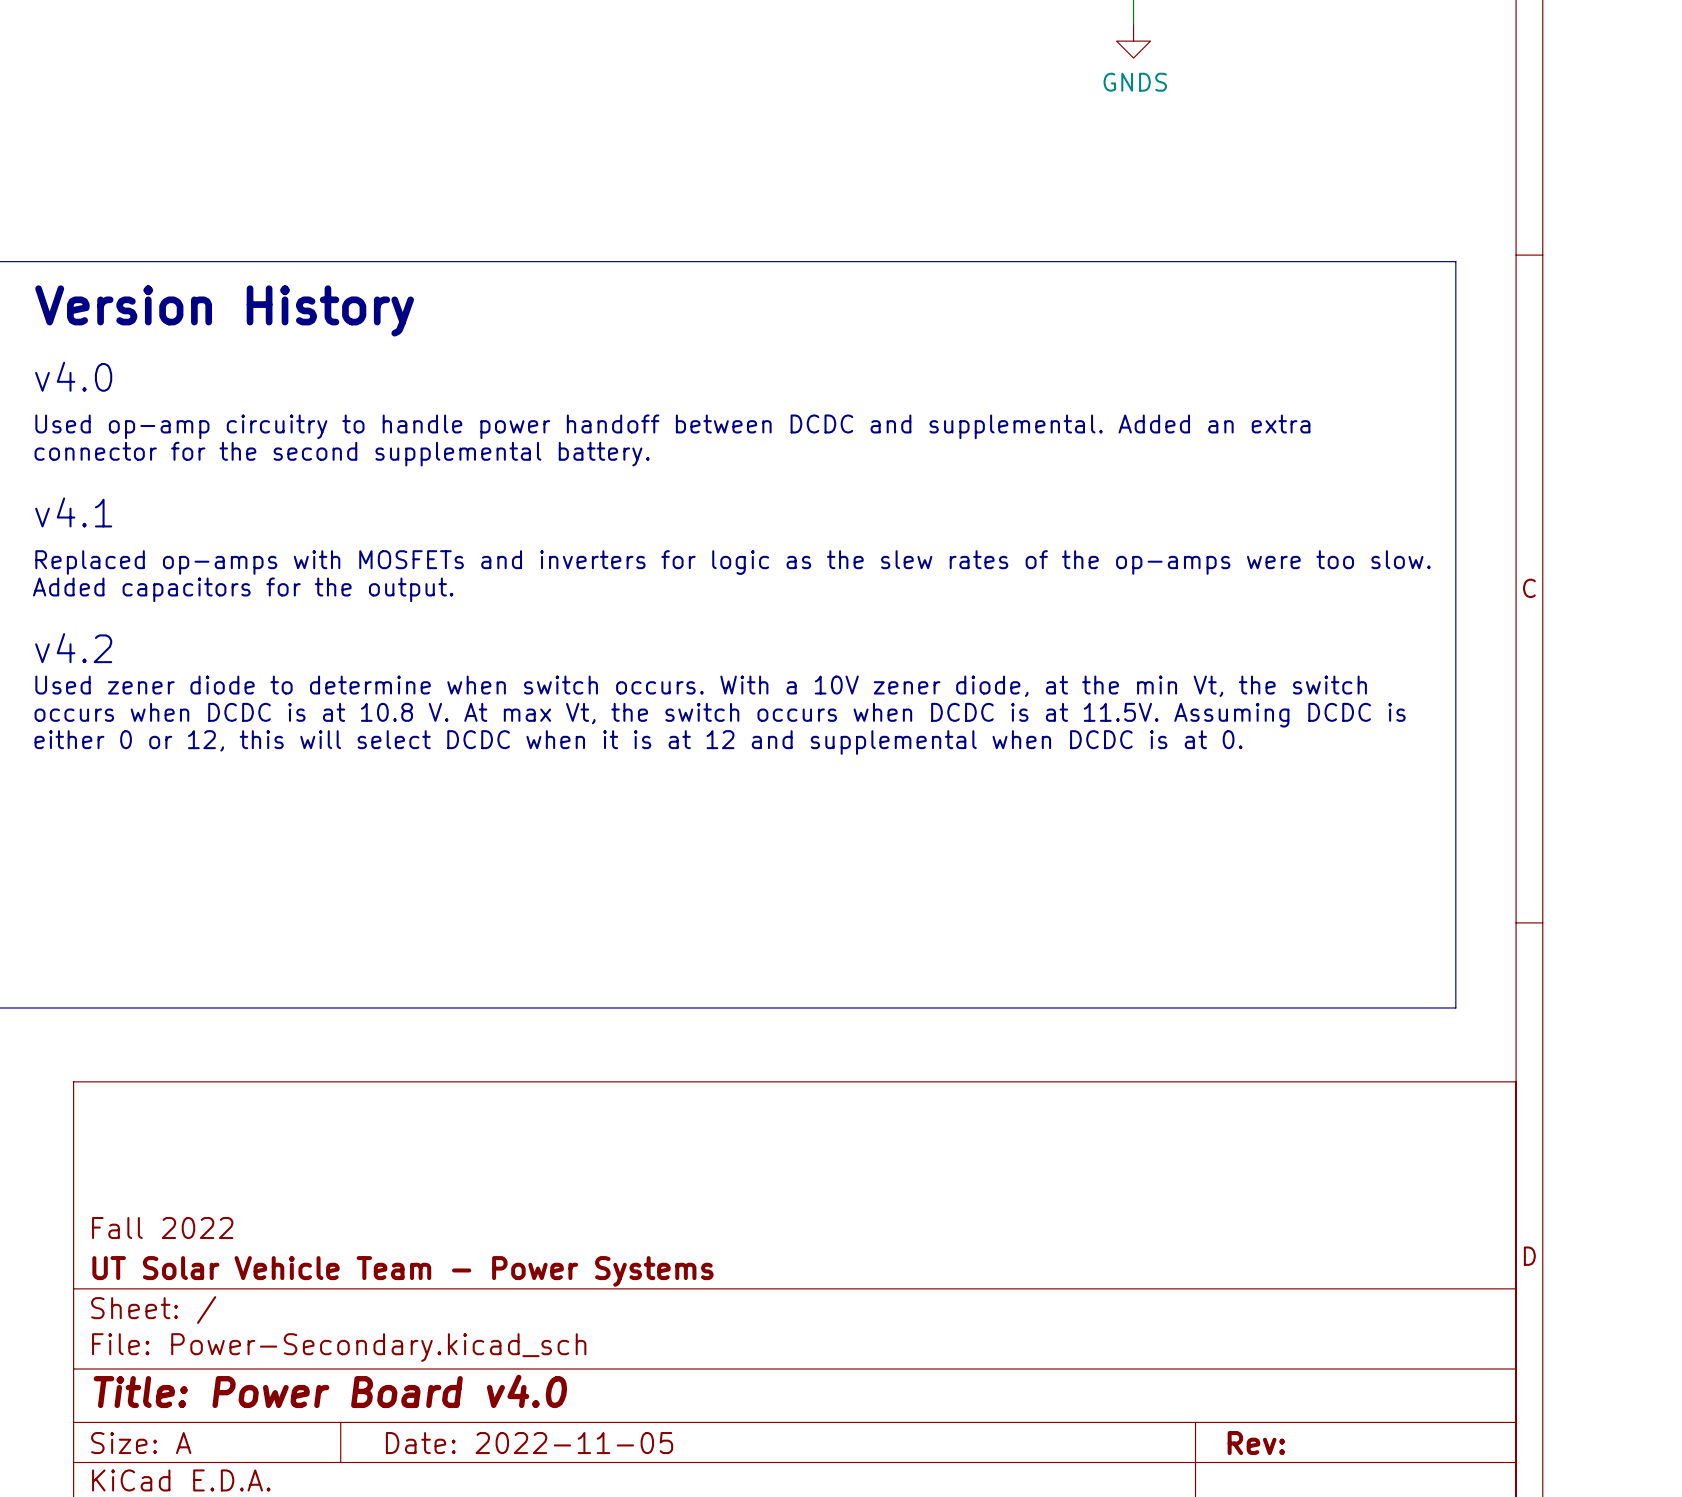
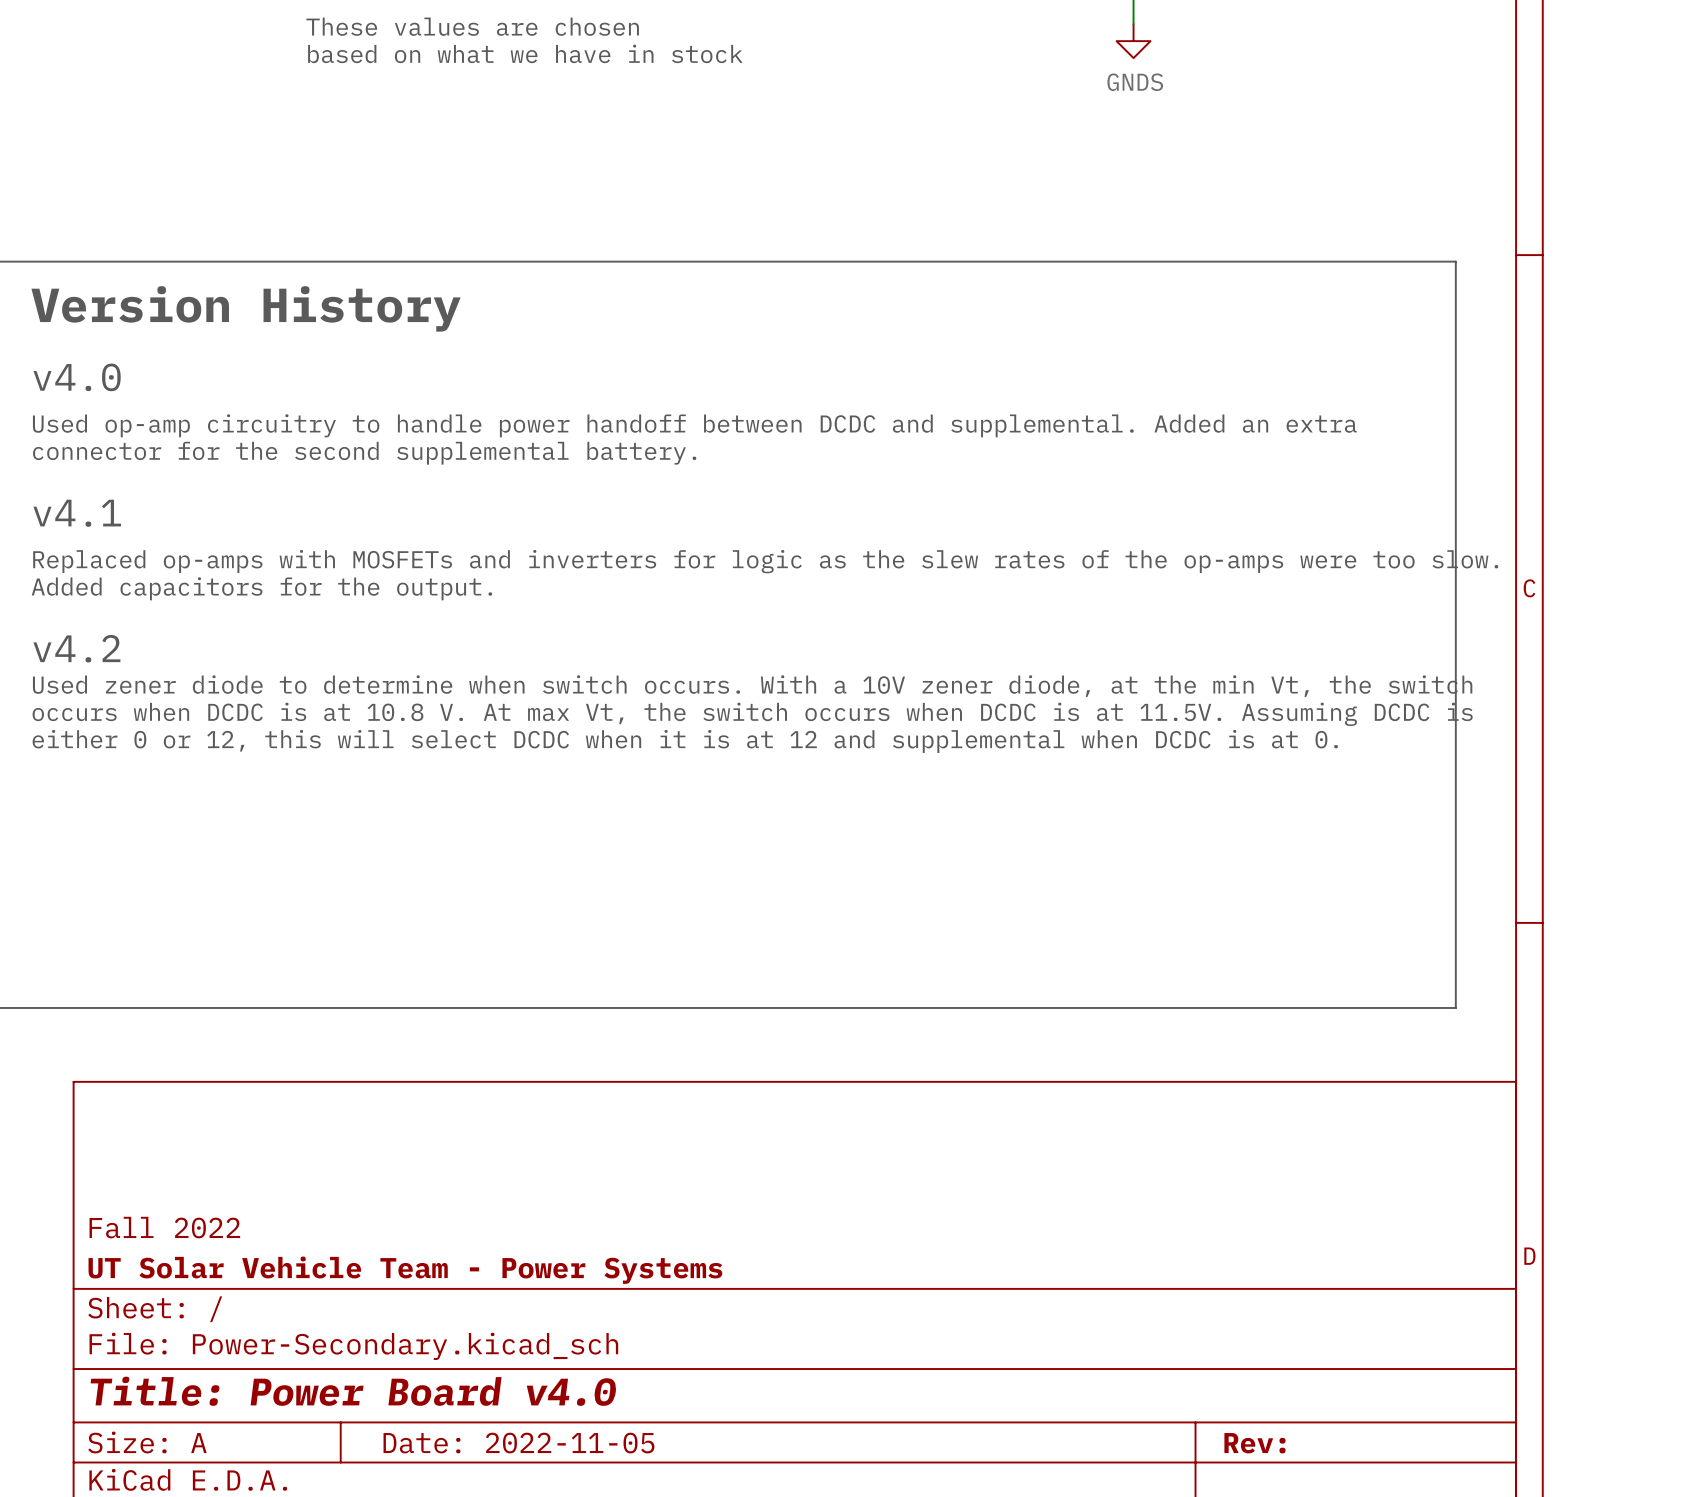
text: none -> These values are chosen (472, 26)
text: none -> based on what we have in stock (525, 53)

